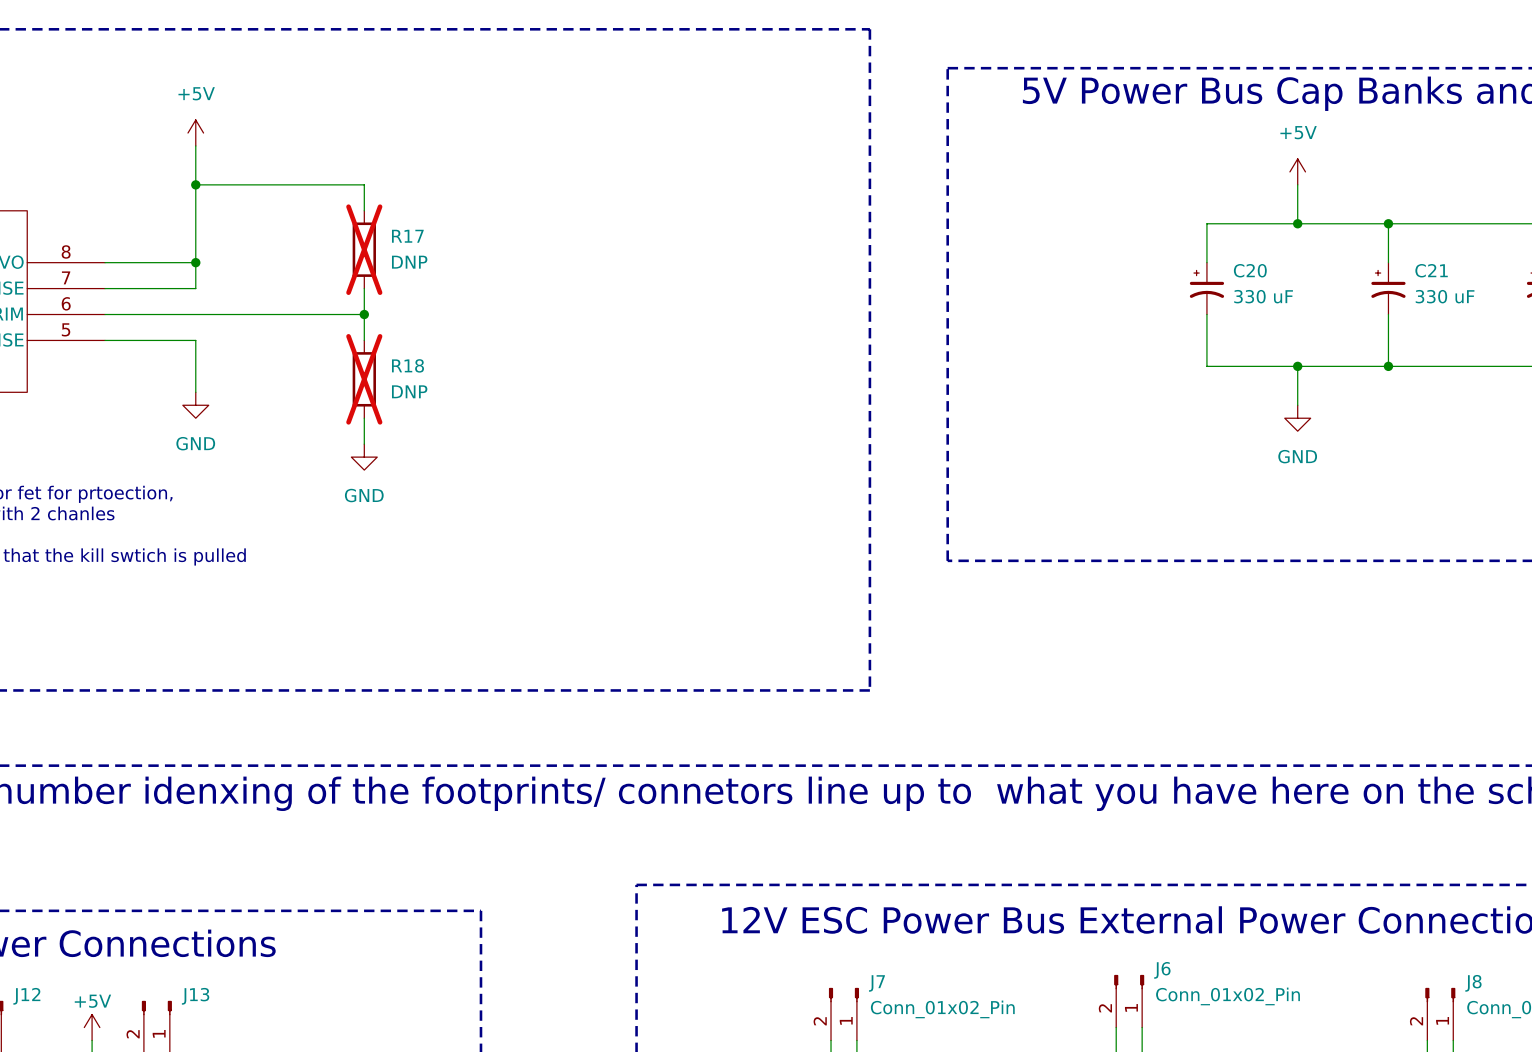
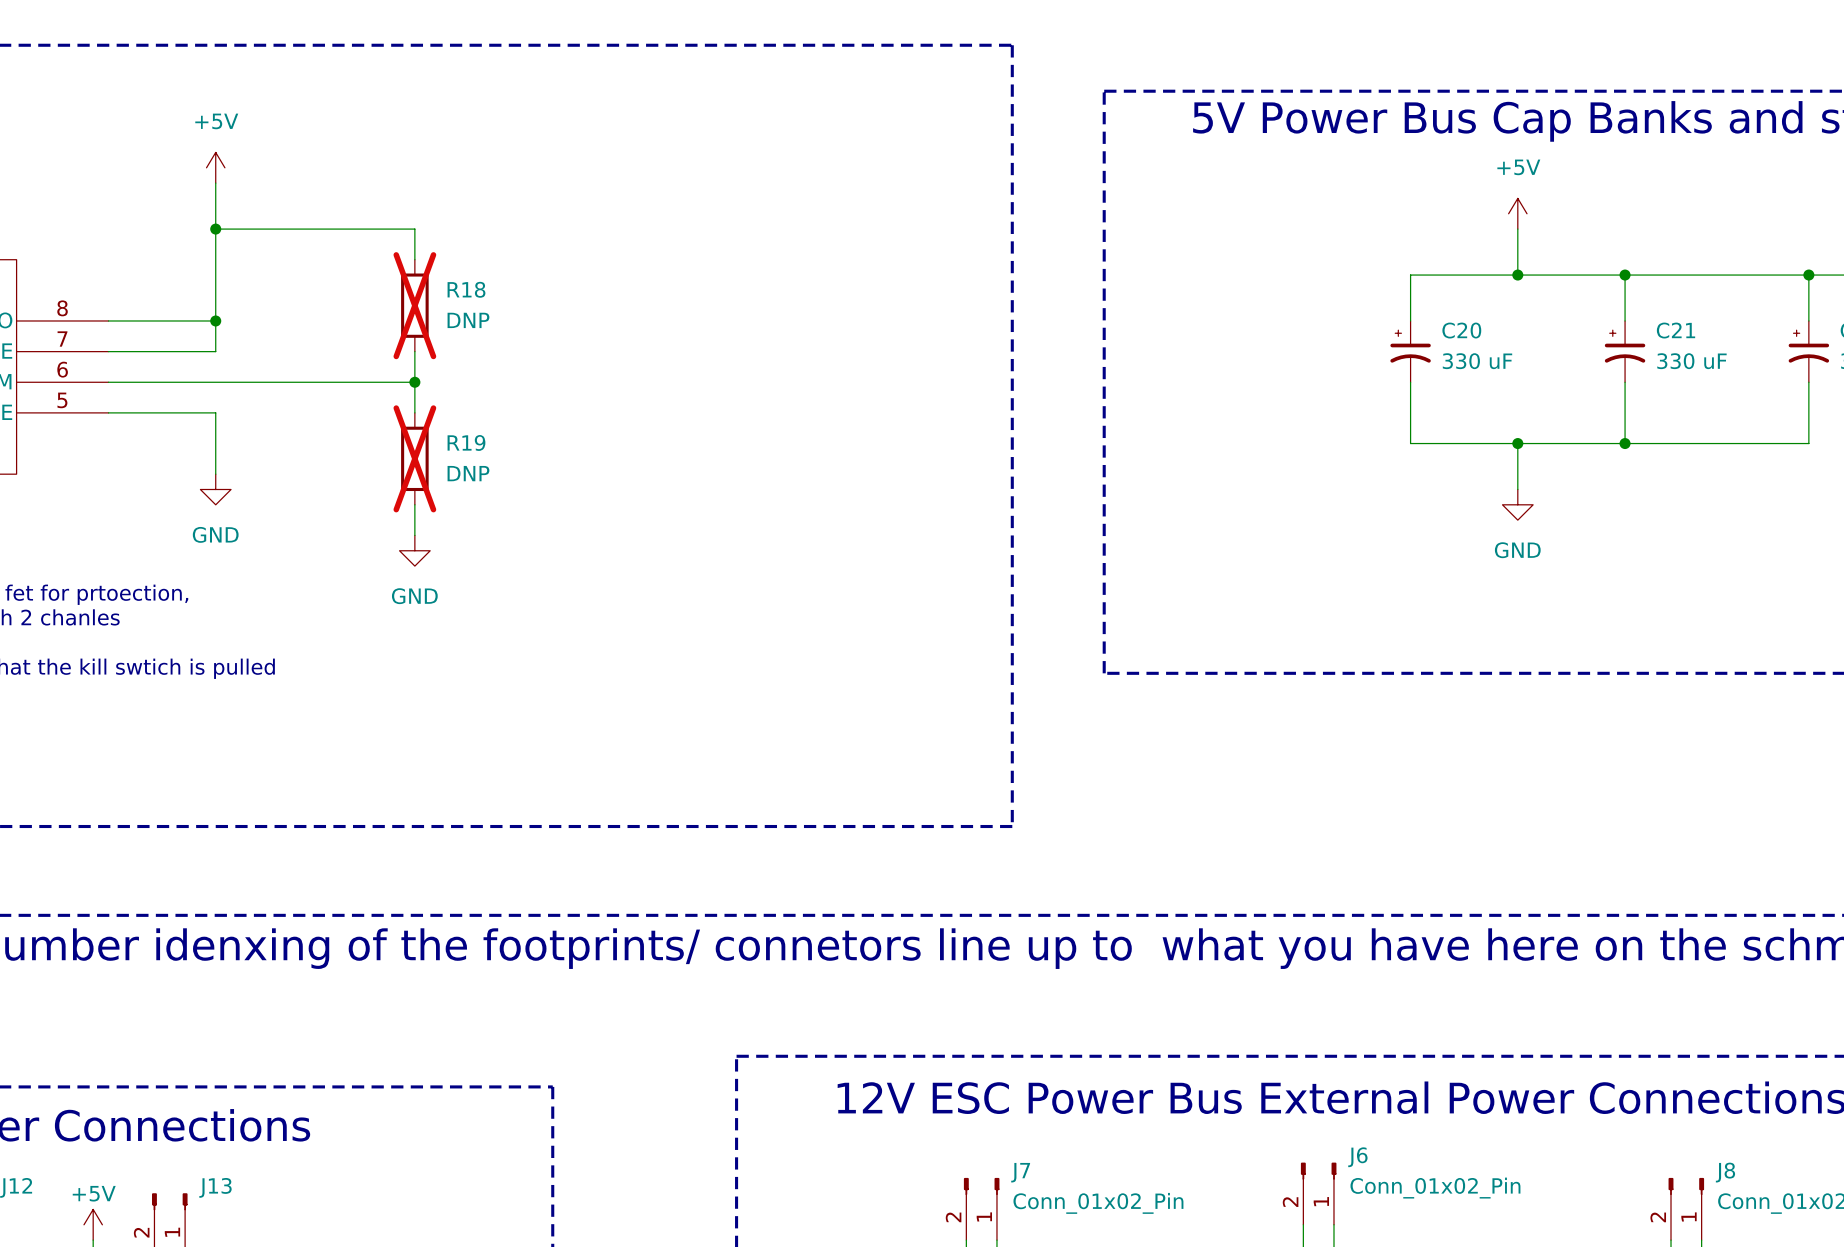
R17 name: R17 (407, 236) -> R18 (466, 289)
R18 name: R18 (407, 365) -> R19 (466, 442)

